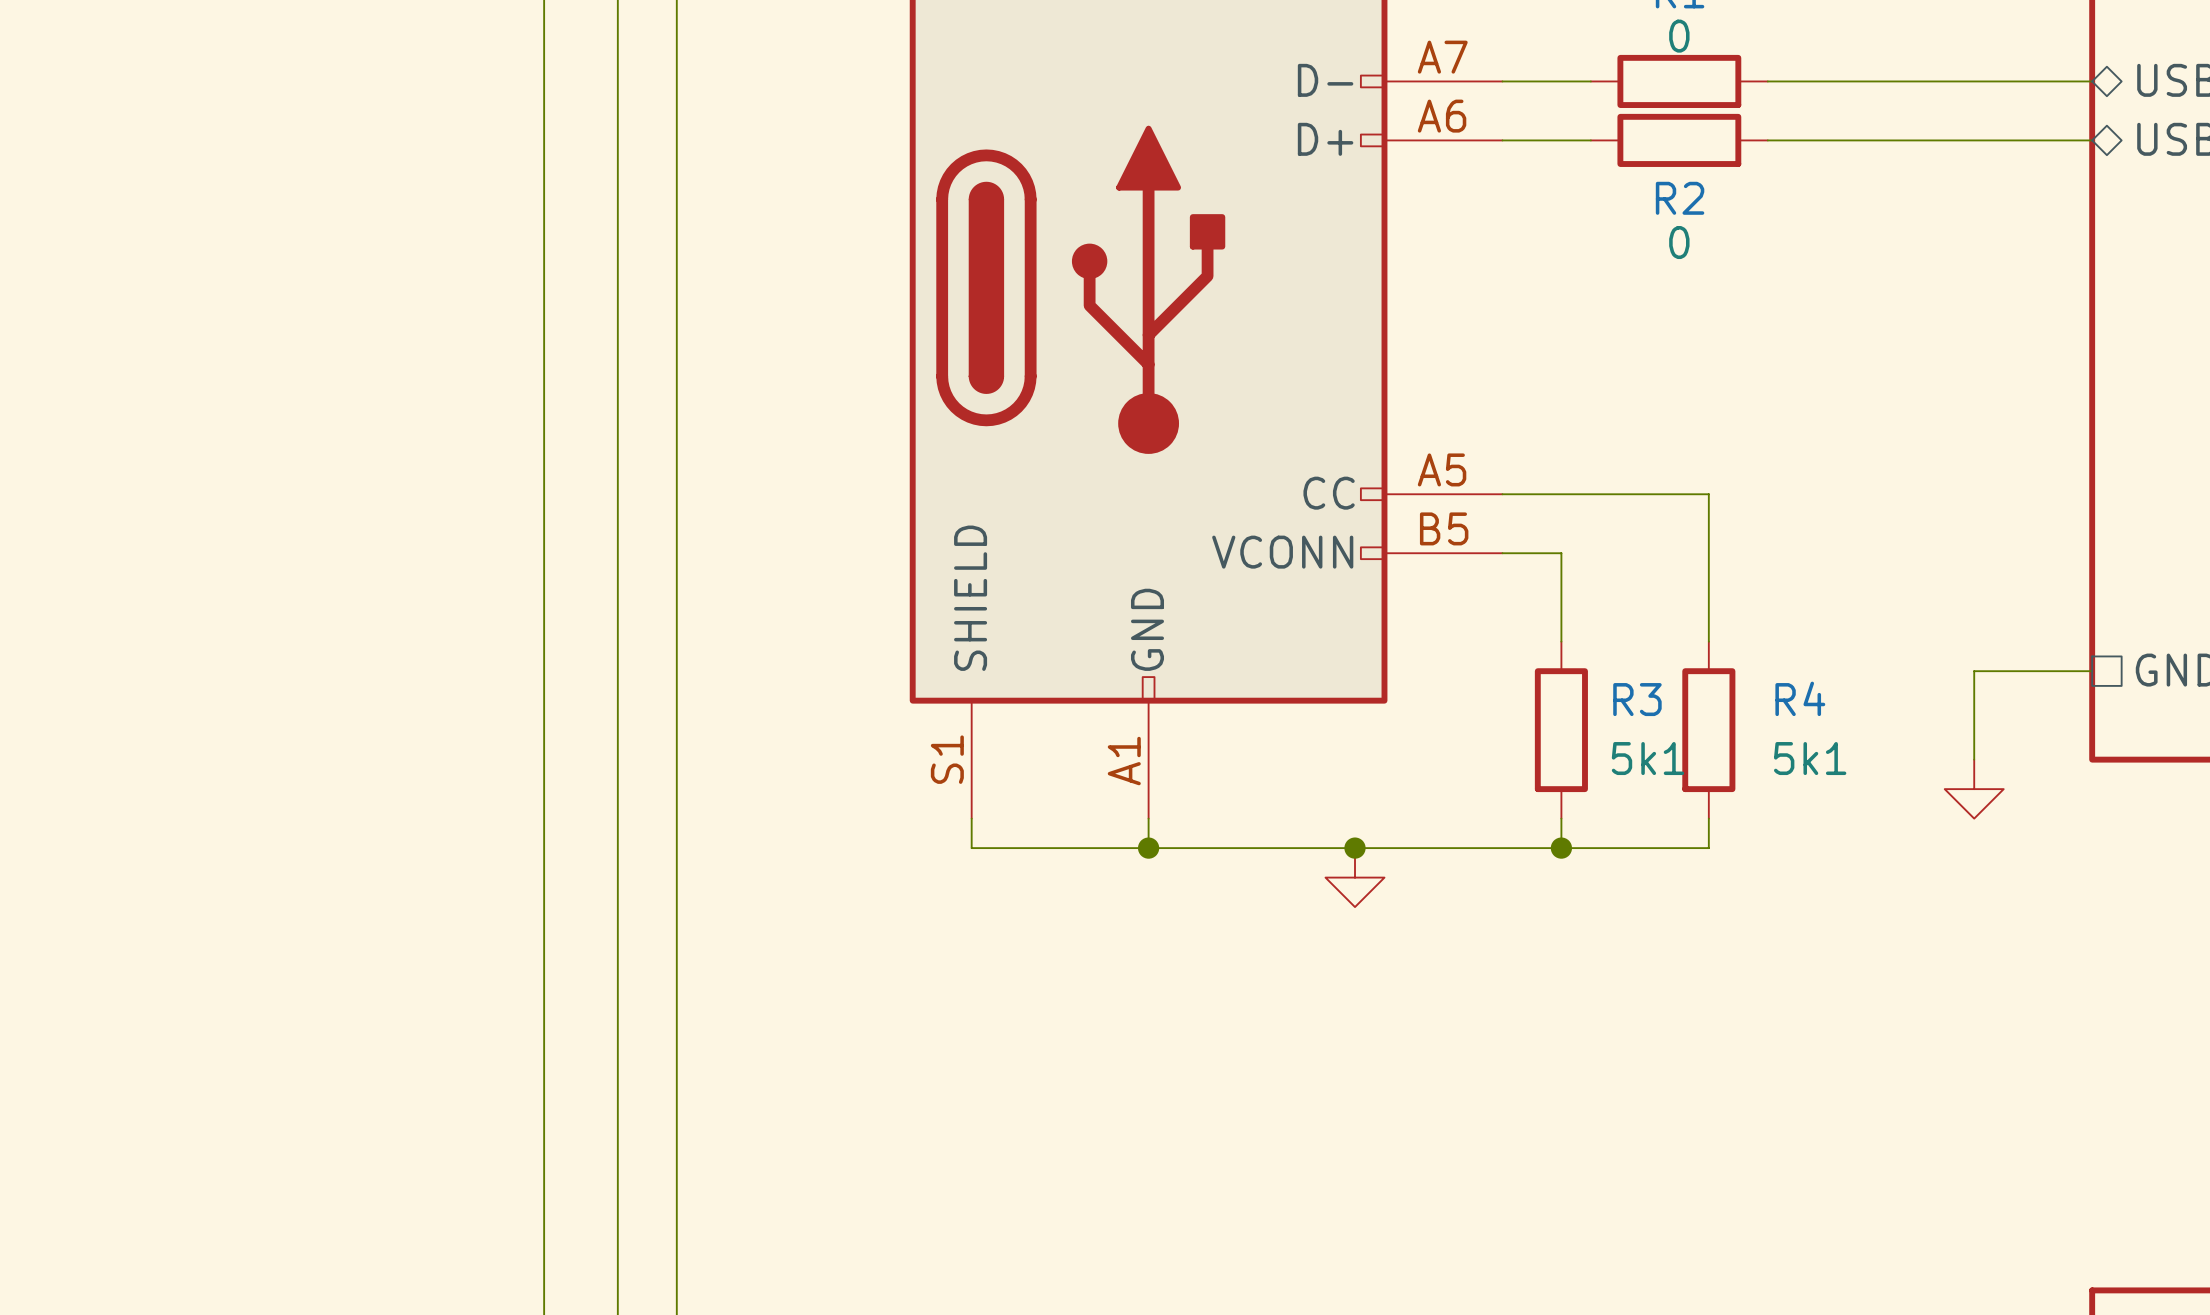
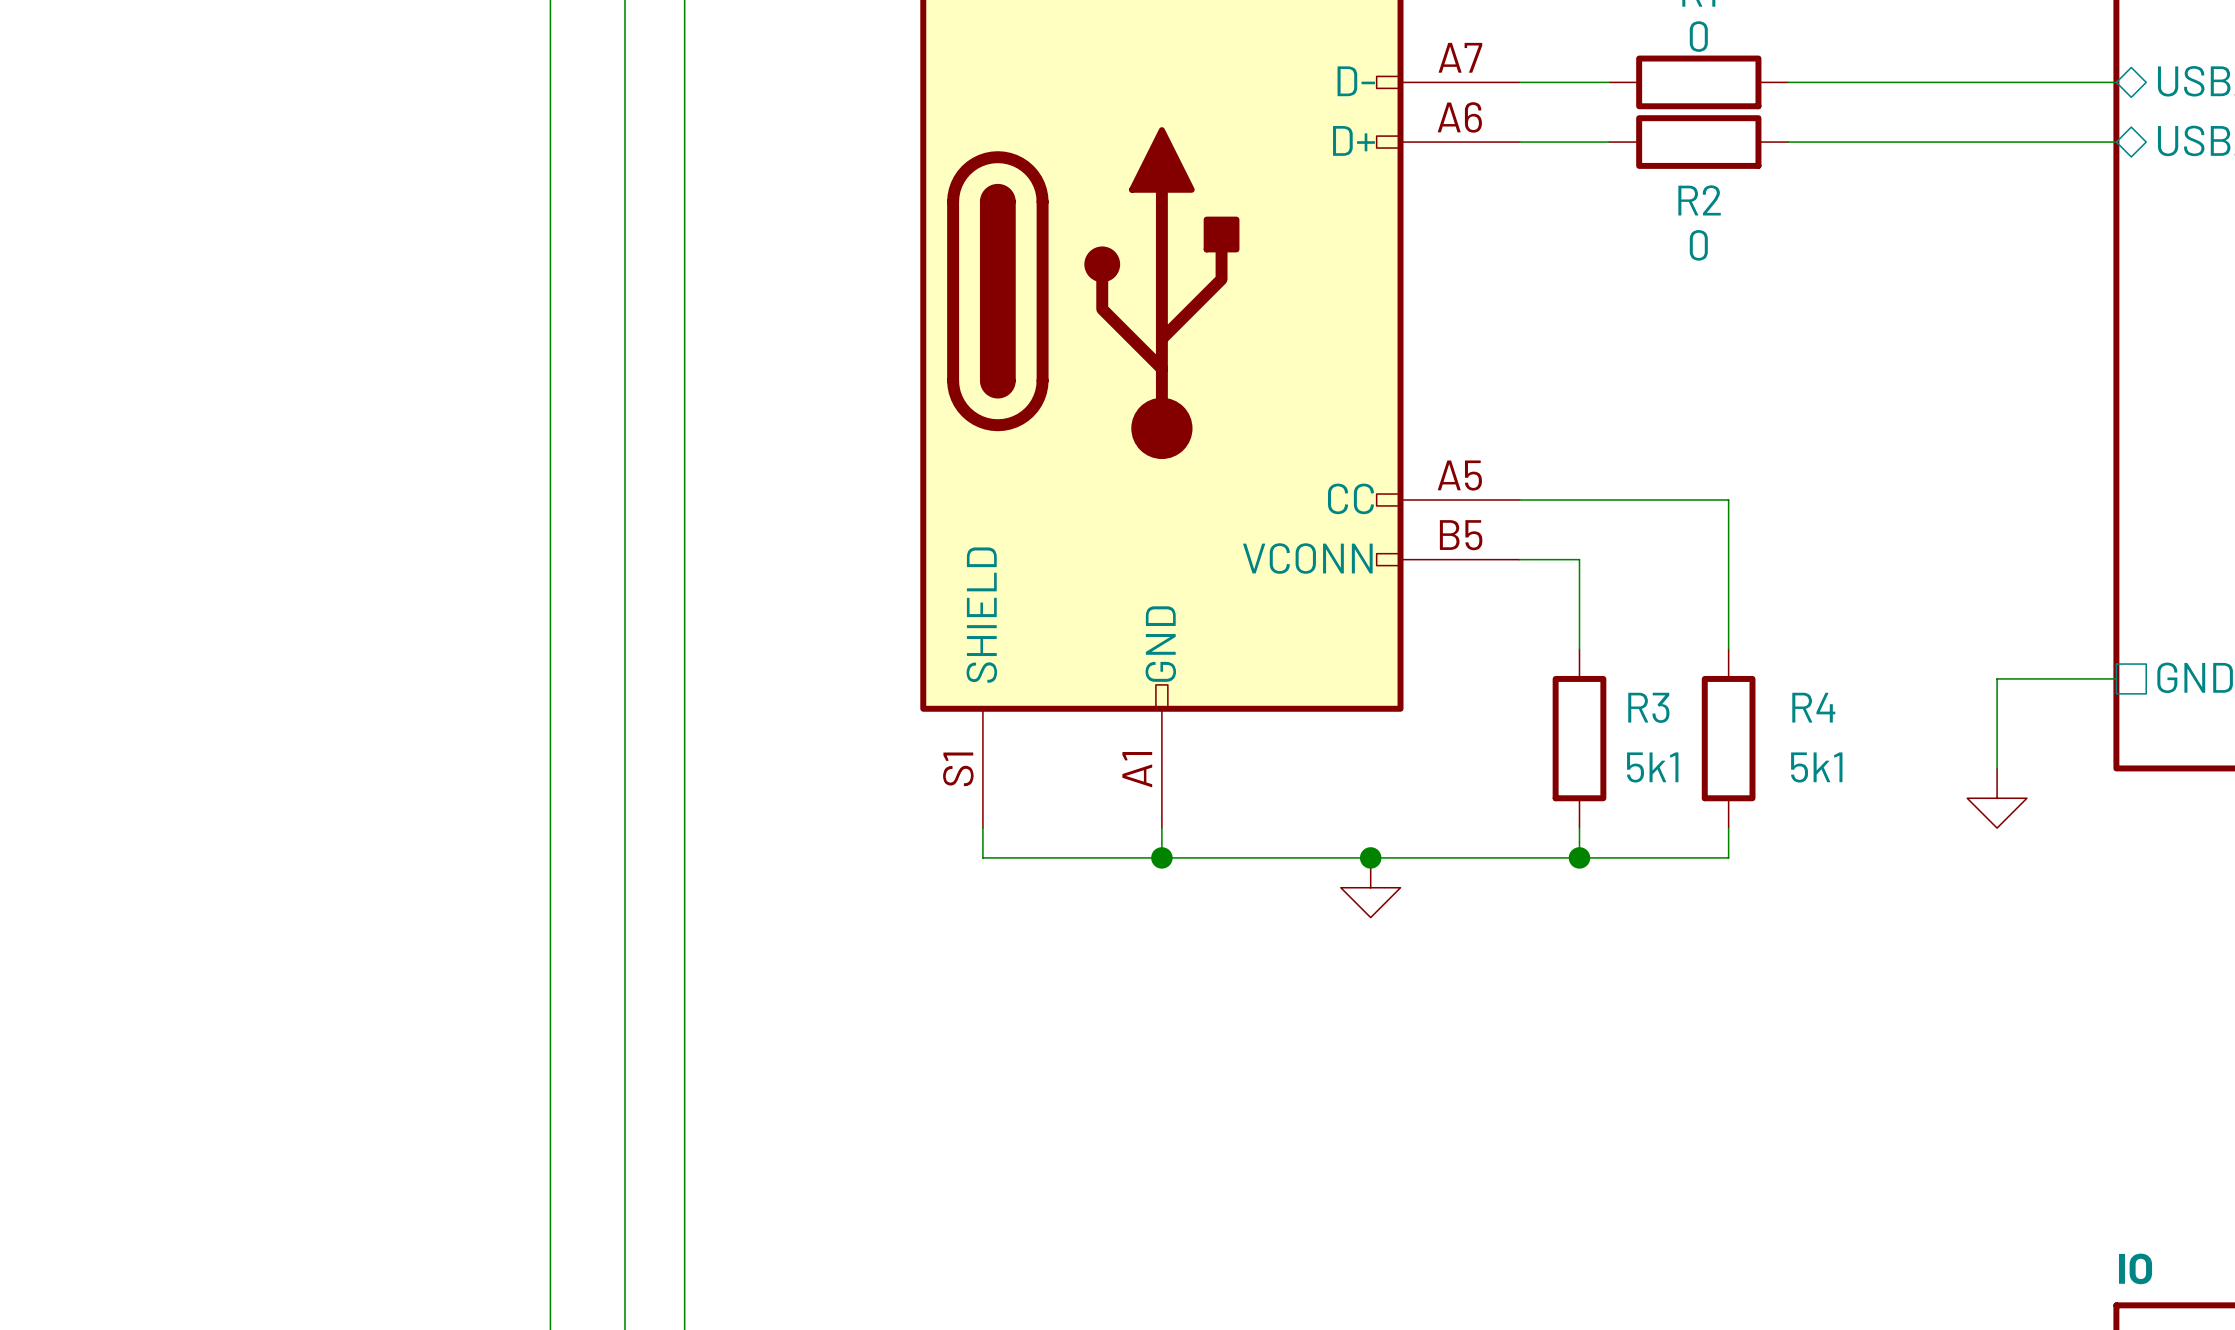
sheet IO name: none -> IO (2135, 1268)

